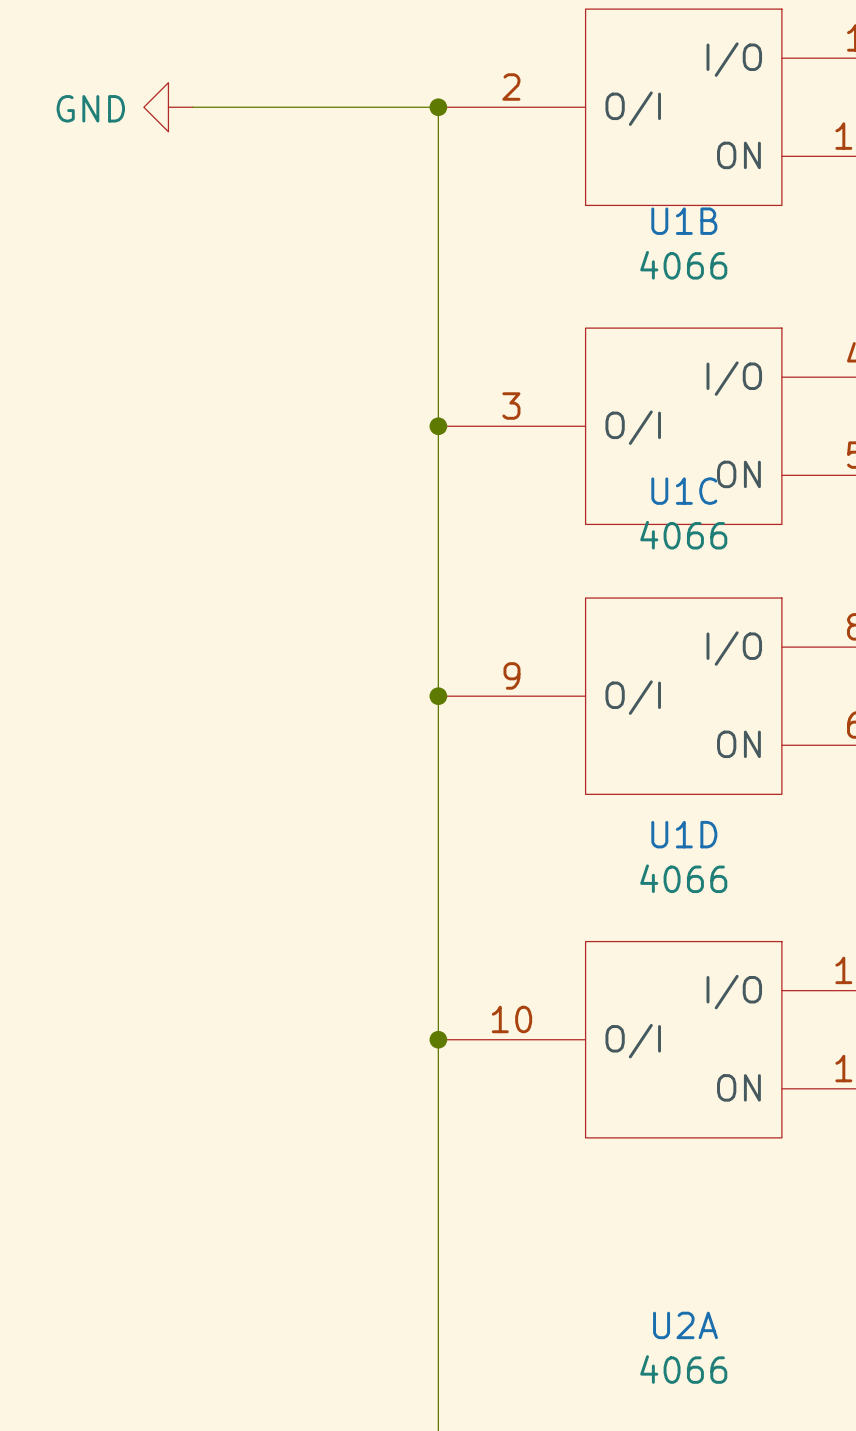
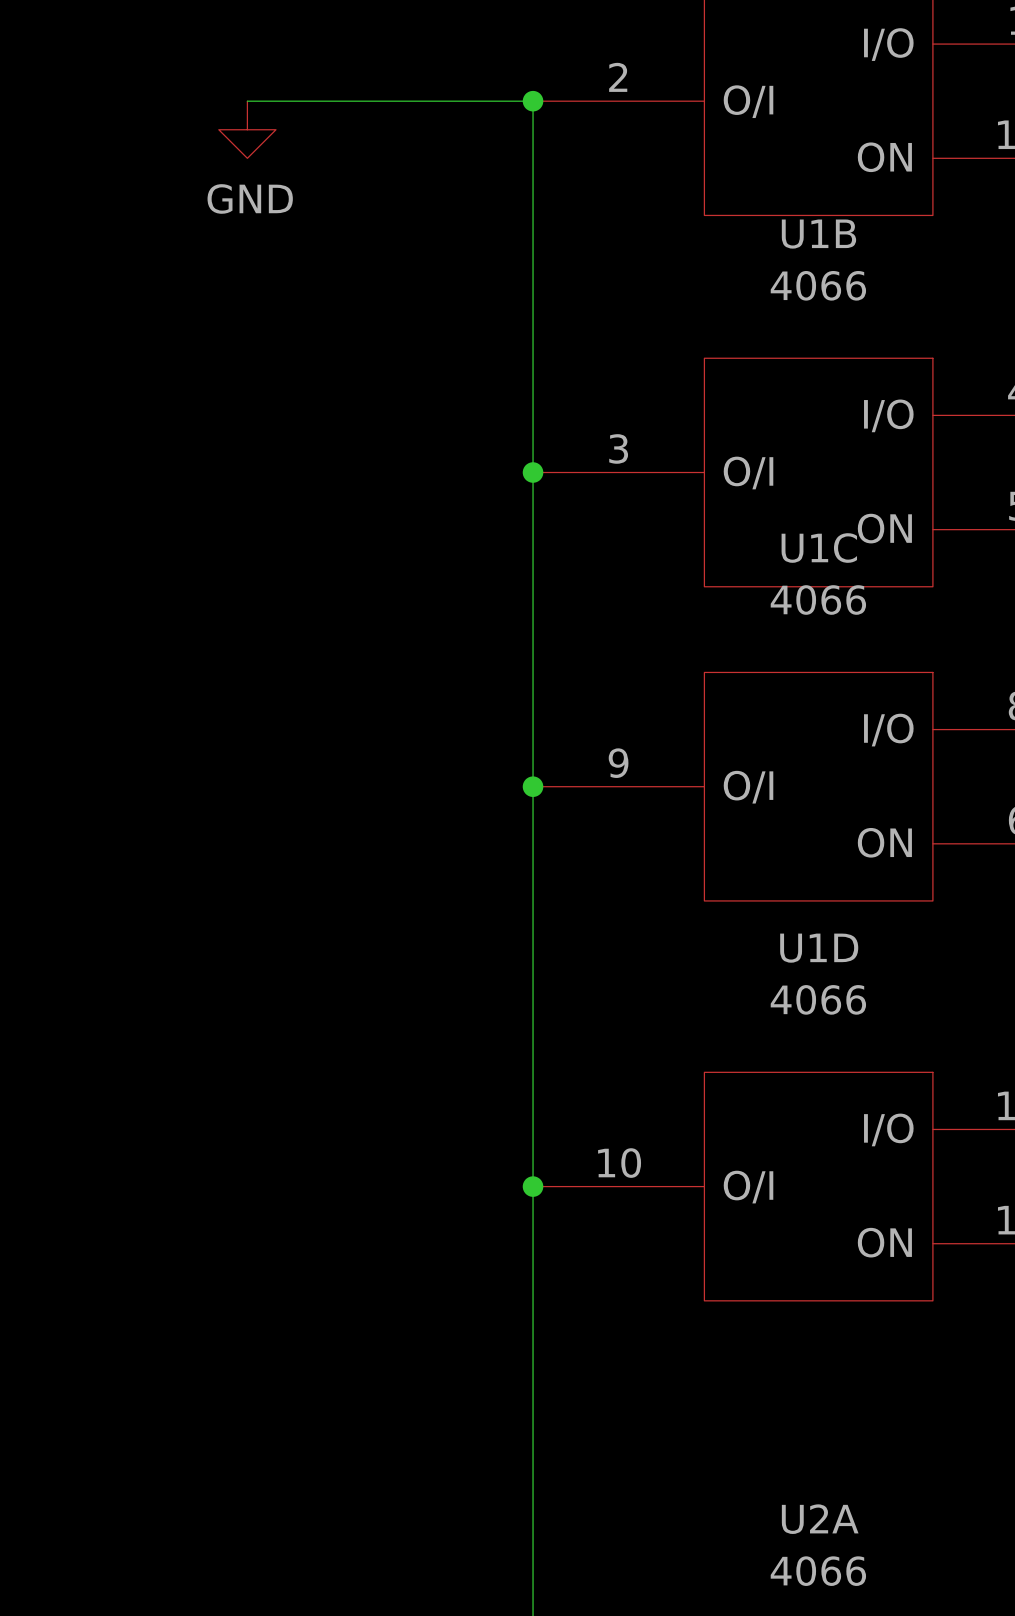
power symbol rotation: 0° (168, 107) -> 90° counterclockwise (247, 129)
power symbol position: GND (168, 107) -> GND (247, 129)

